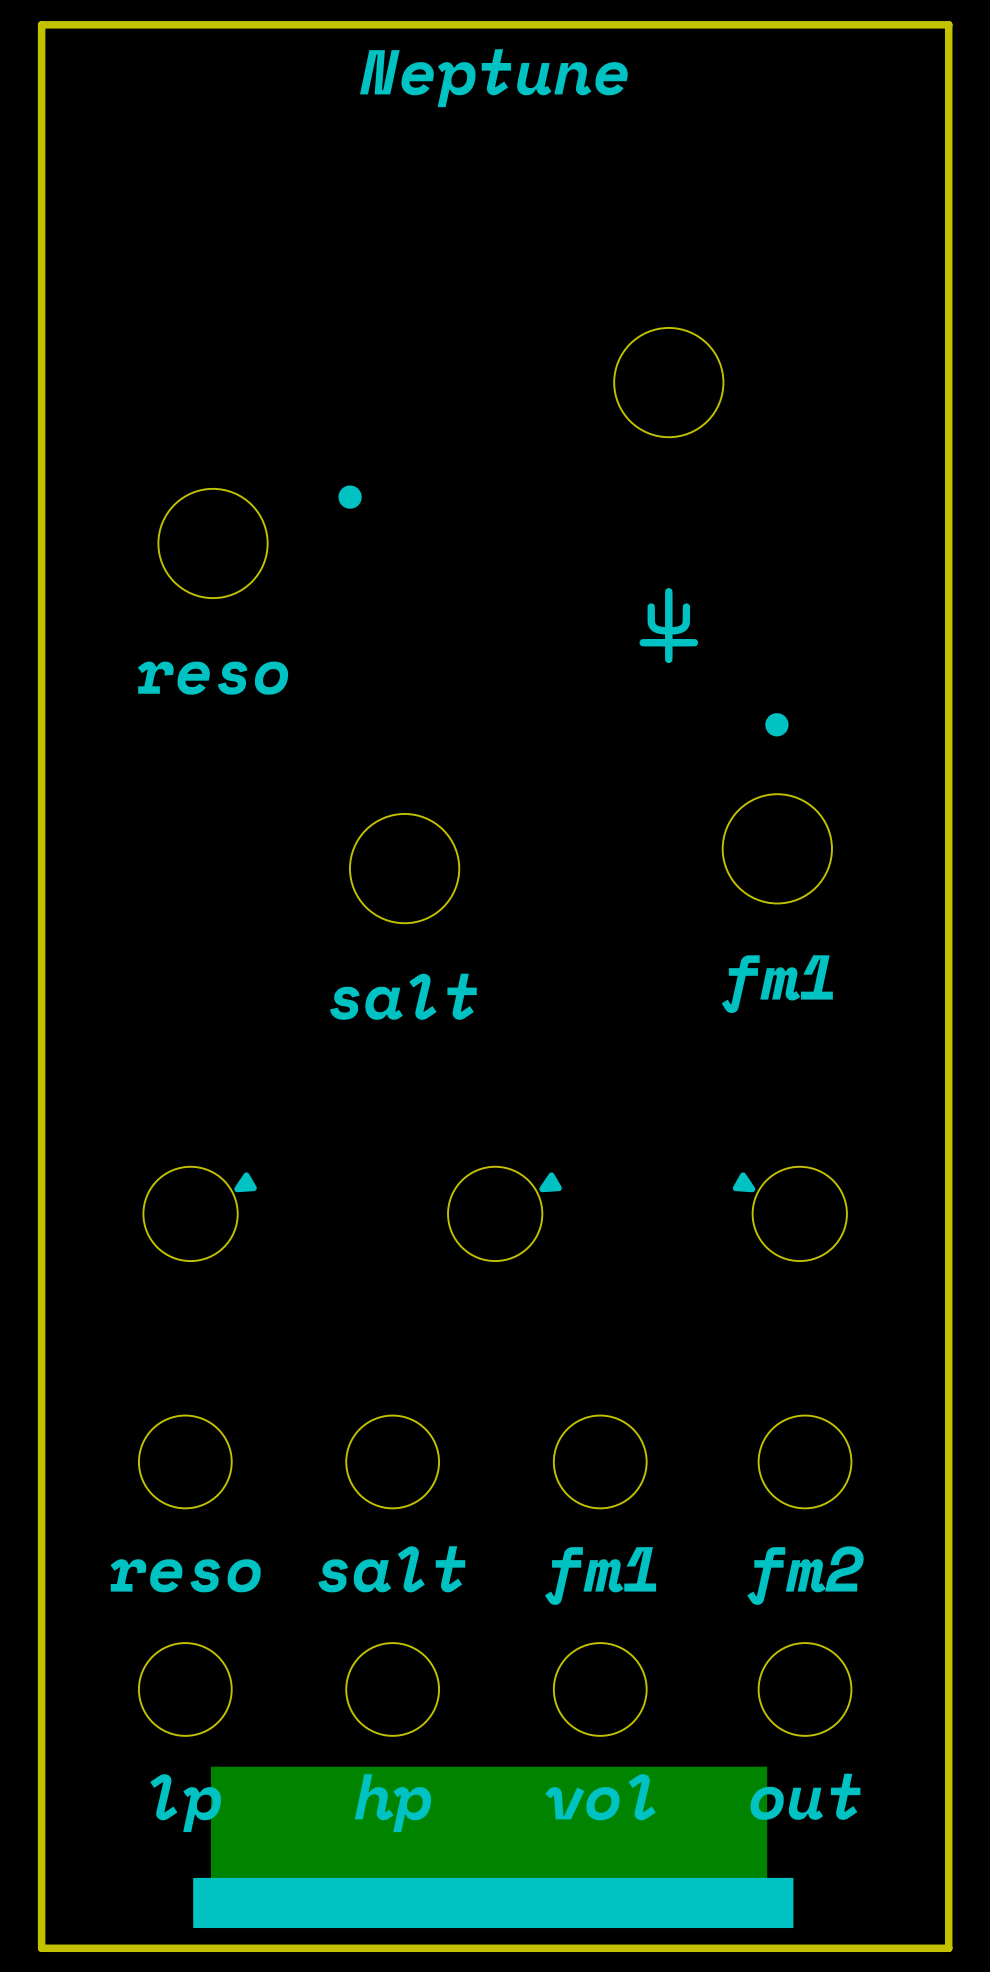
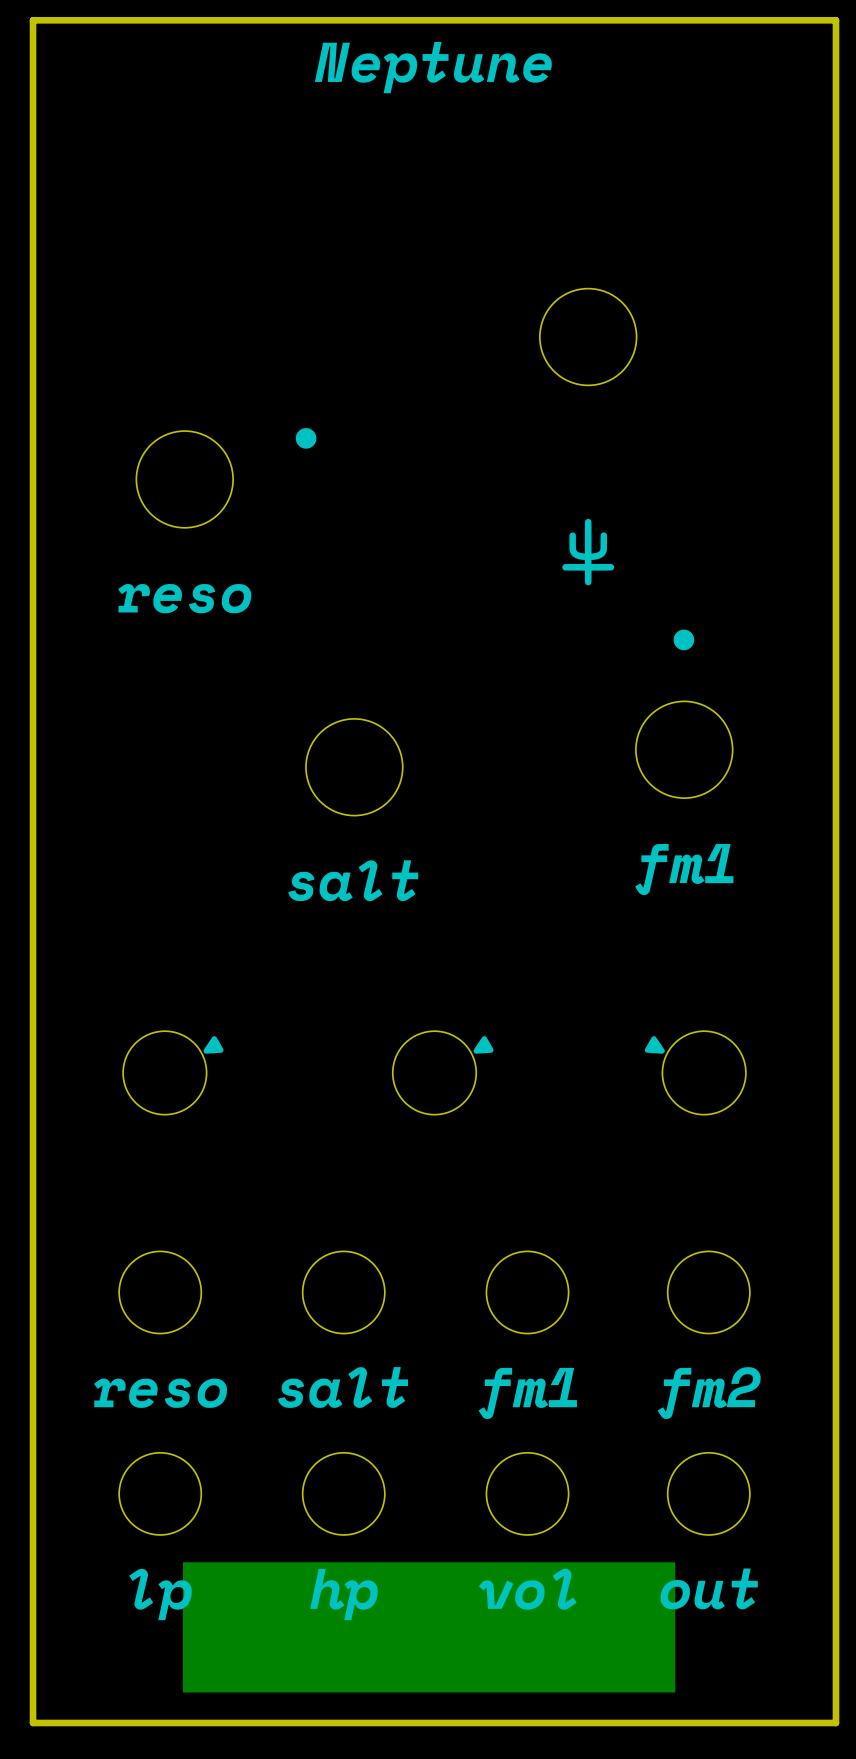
drawing: [193, 1877, 794, 1929] -> none

